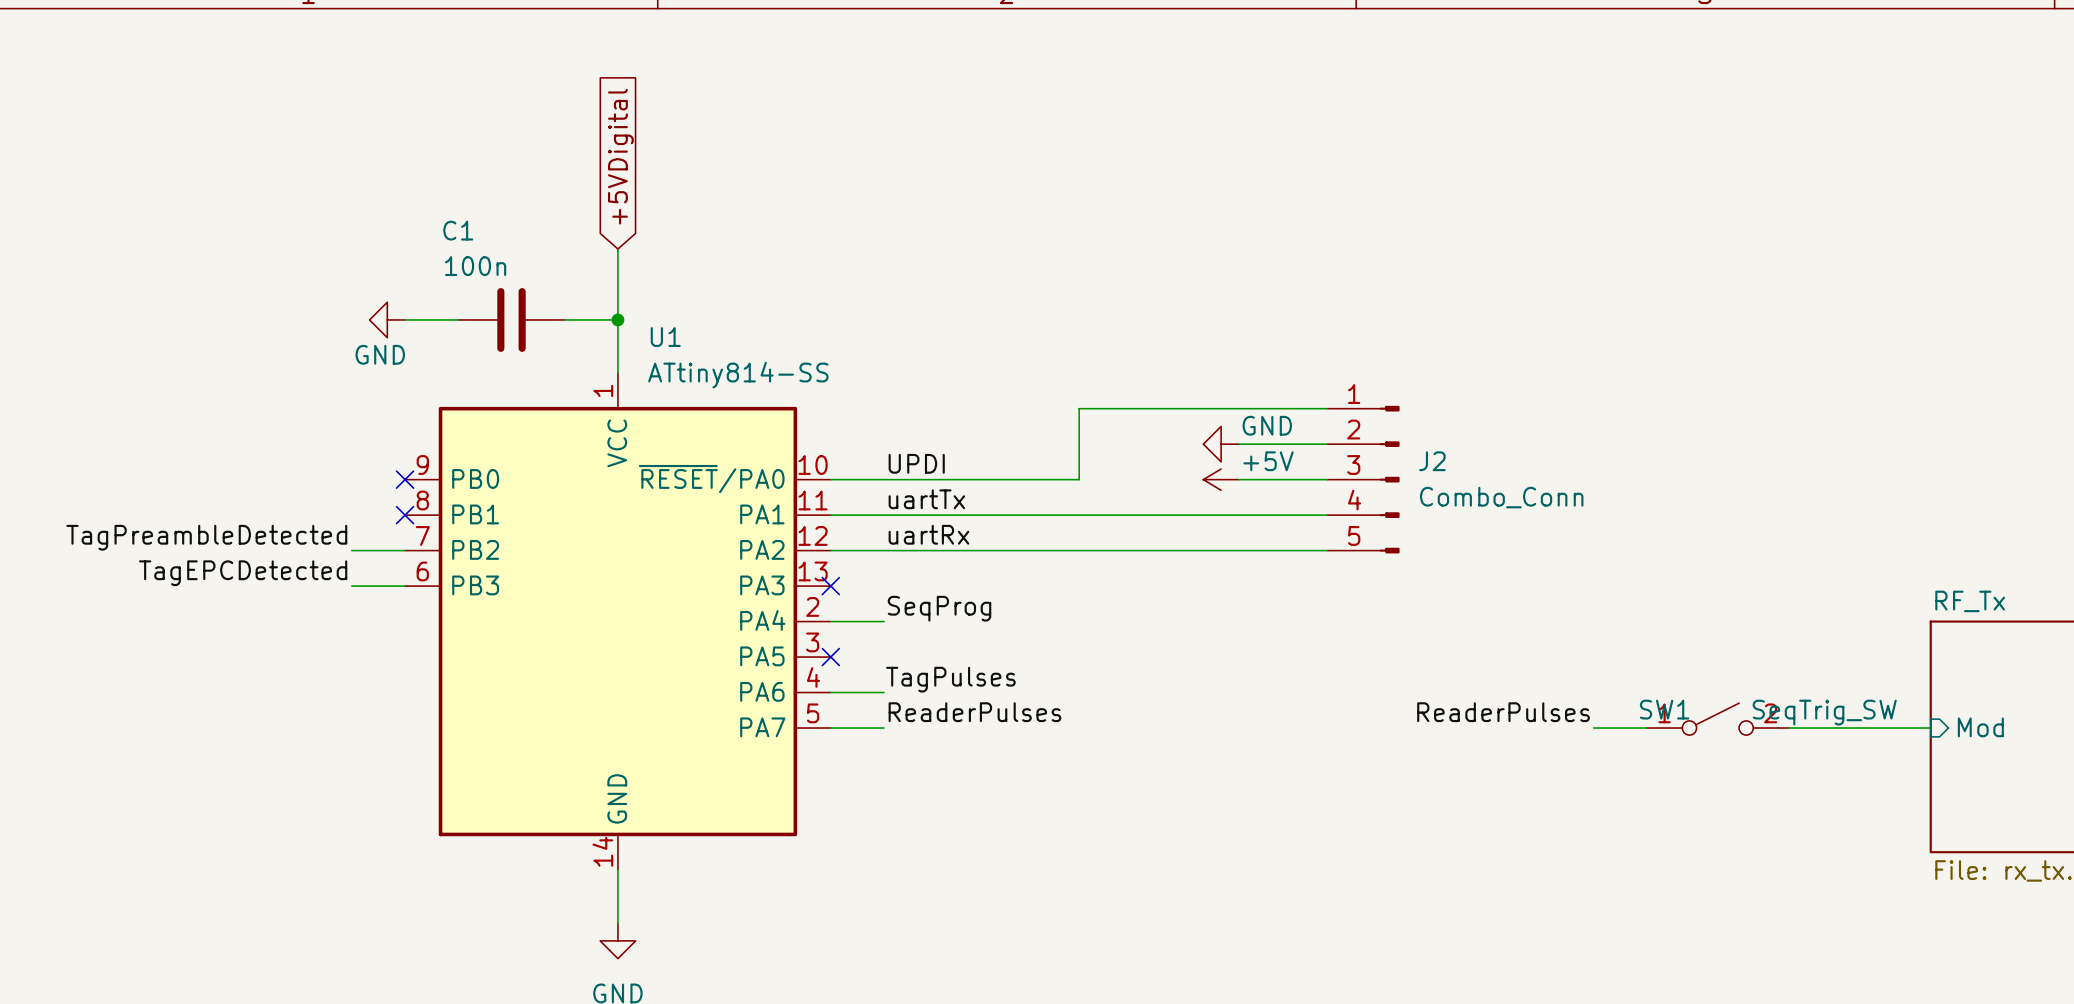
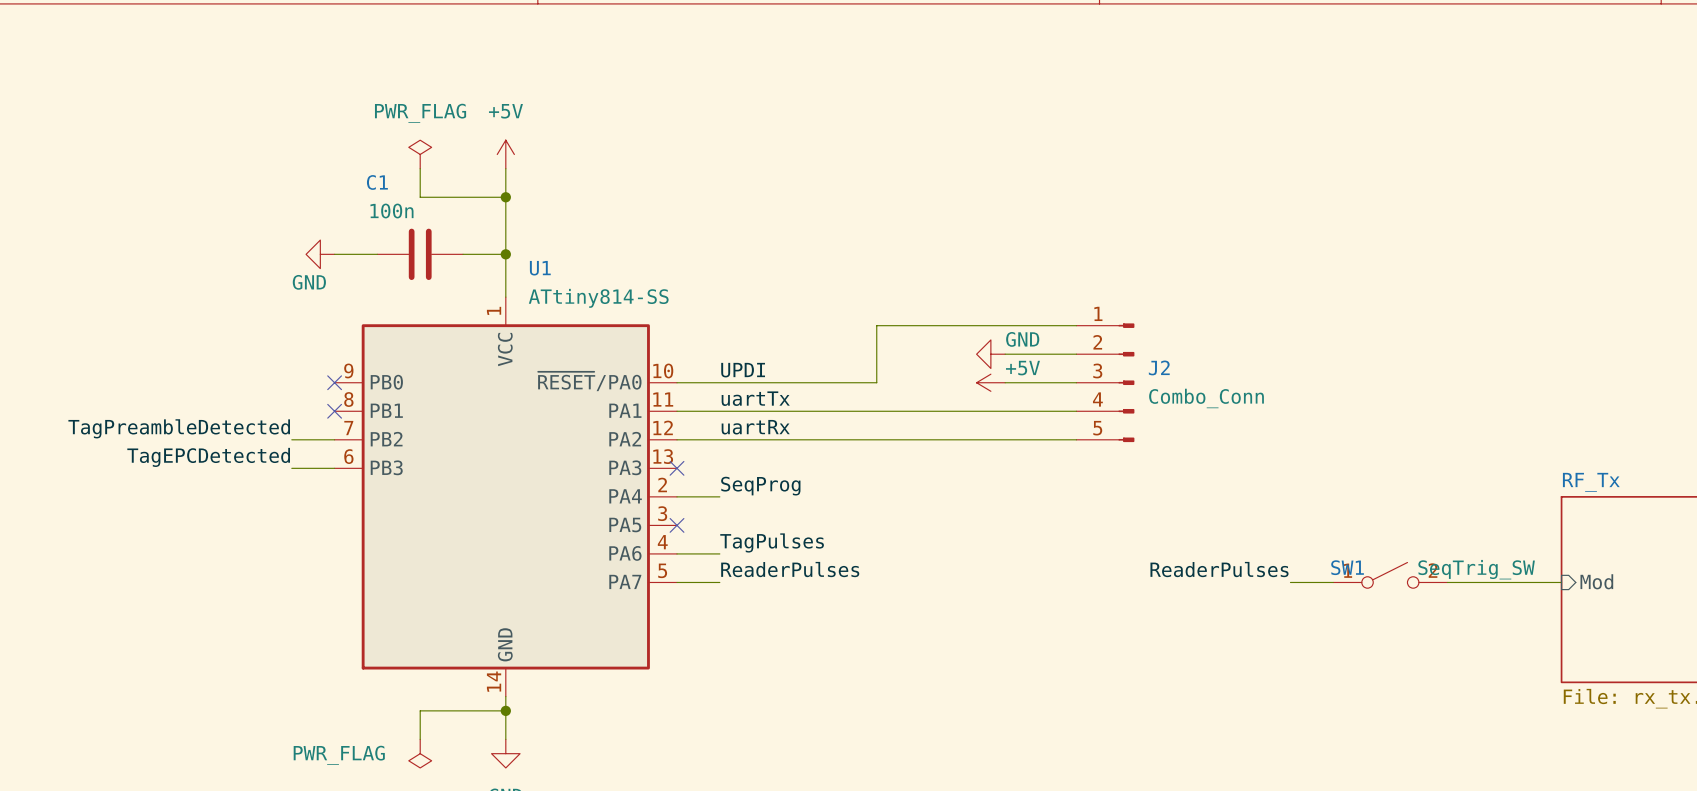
global label: +5VDigital (620, 156) -> none
power symbol: none -> PWR_FLAG (420, 154)
power symbol: none -> +5V (505, 154)
wire: none -> (420, 168) (420, 197) (505, 197) (505, 168)
junction: none -> (505, 197)
wire: none -> (505, 710) (420, 710) (420, 739)
junction: none -> (505, 710)
power symbol: none -> PWR_FLAG (420, 753)

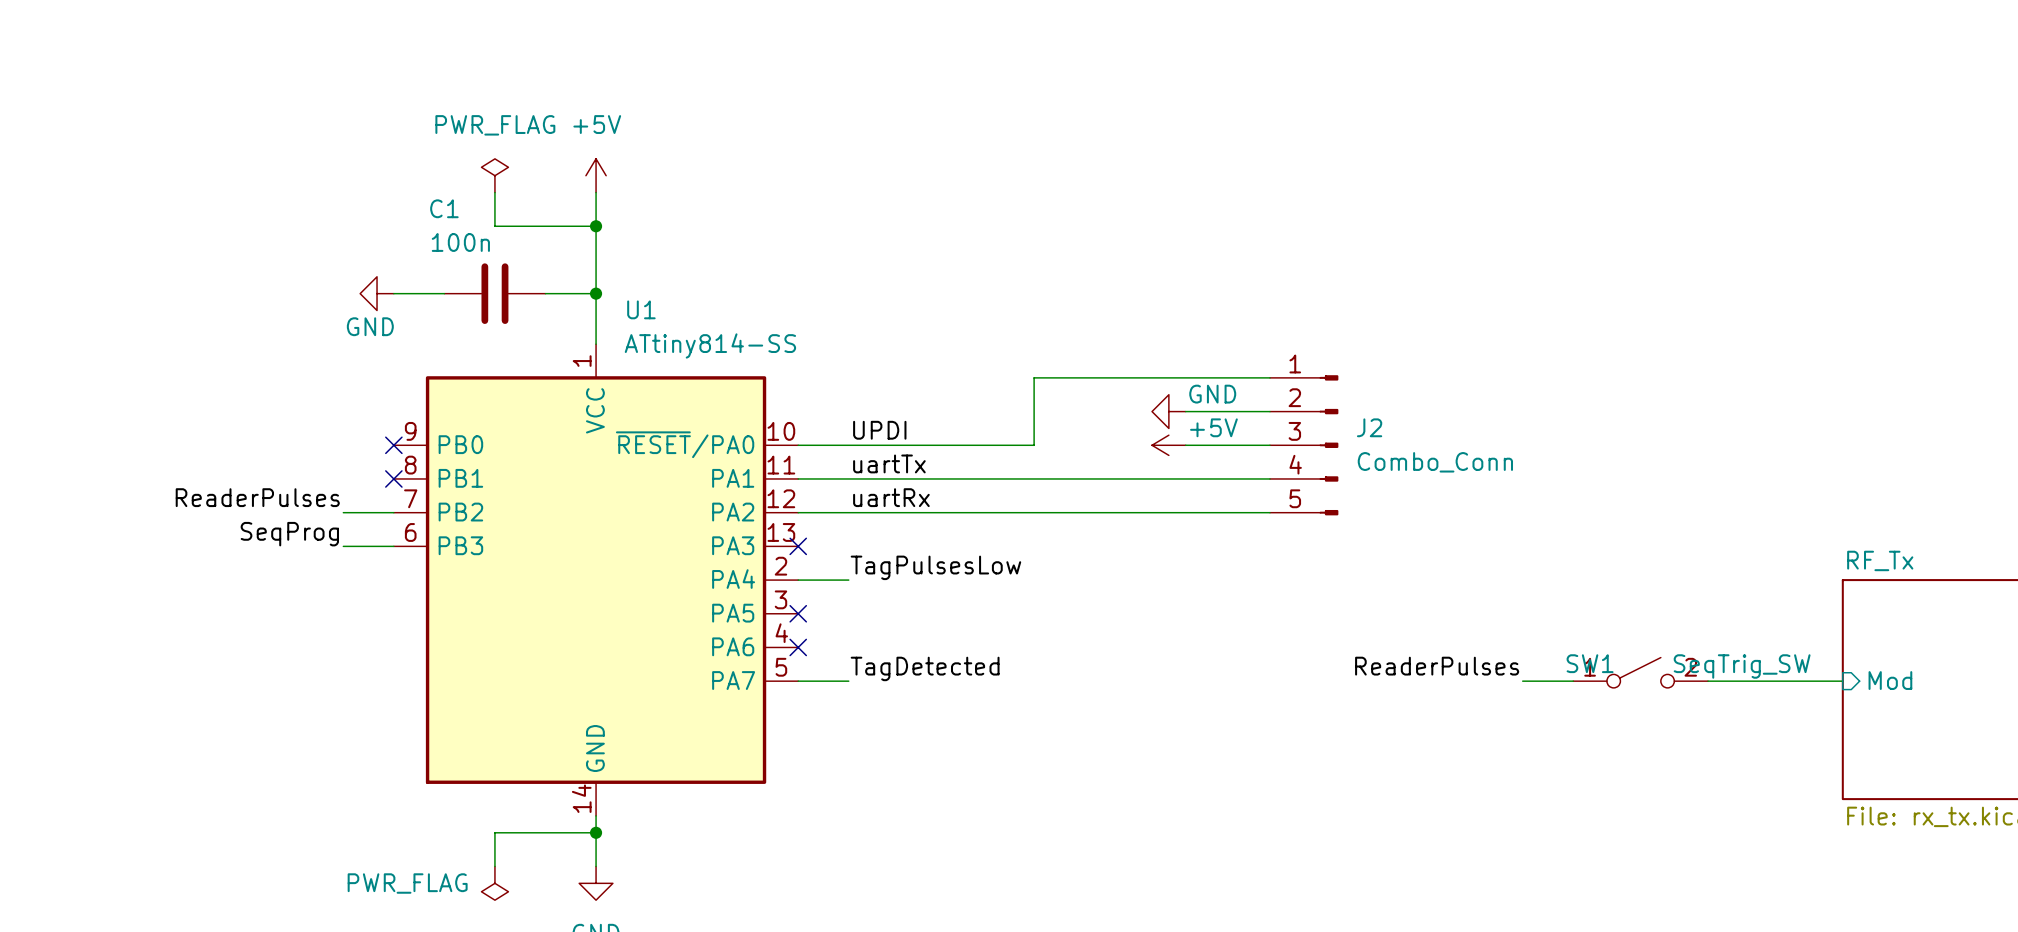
label: TagPreambleDetected (179, 428) -> ReaderPulses (257, 497)
label: TagEPCDetected (208, 457) -> SeqProg (289, 534)
label: SeqProg (760, 486) -> TagPulsesLow (935, 567)
label: TagPulses (772, 542) -> none
wire: (677, 553) (719, 553) -> none
no-connect mark: none -> (798, 647)
label: ReaderPulses (790, 569) -> TagDetected (925, 668)

